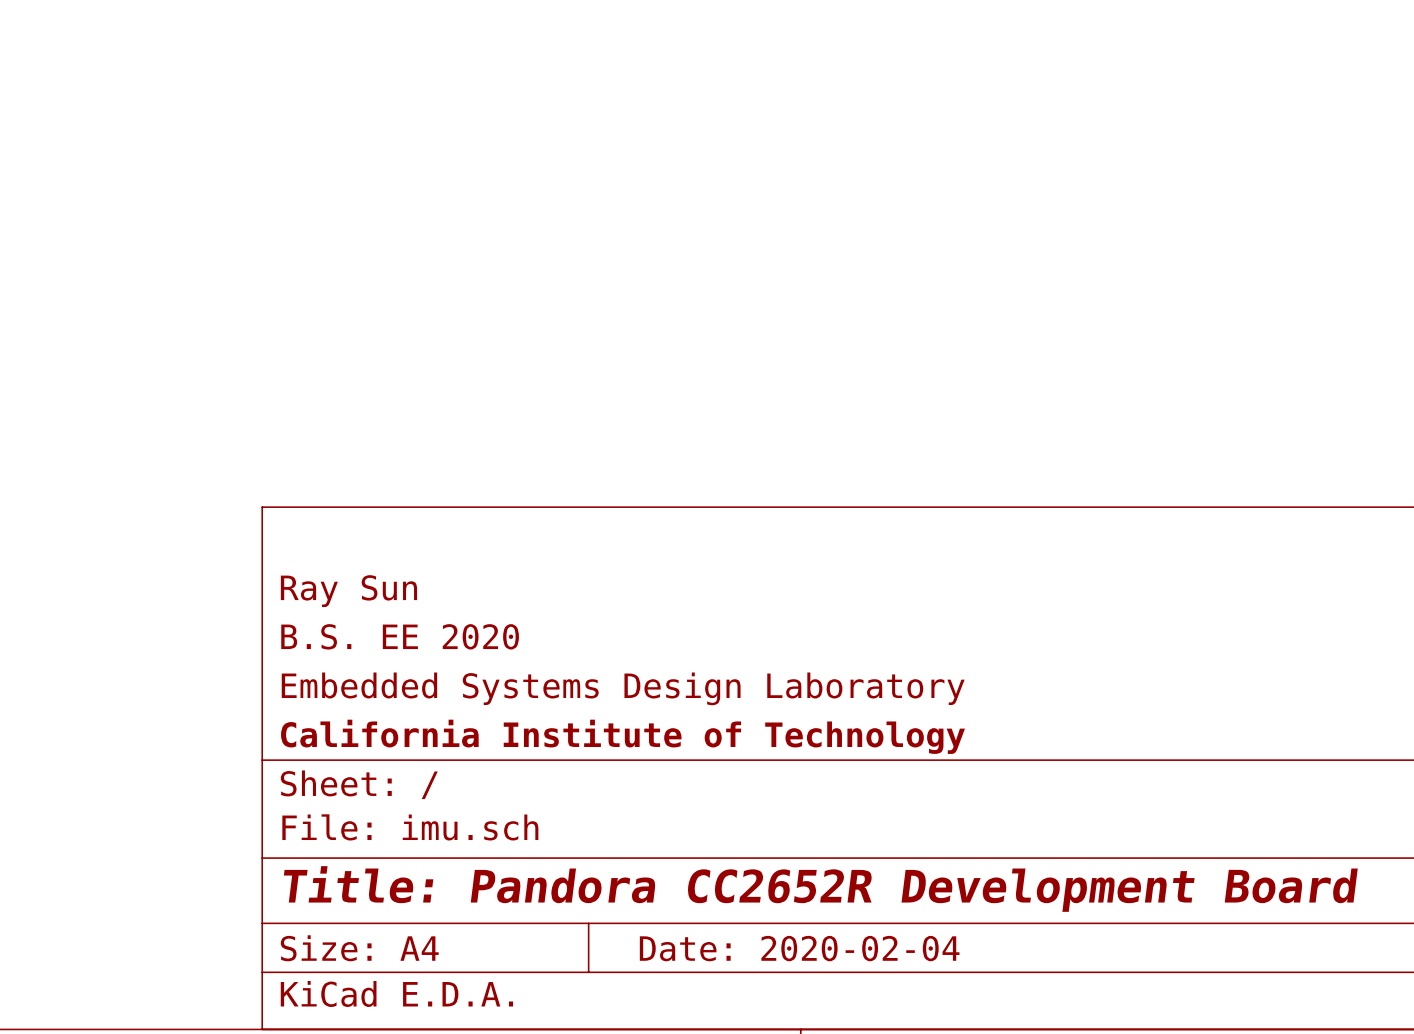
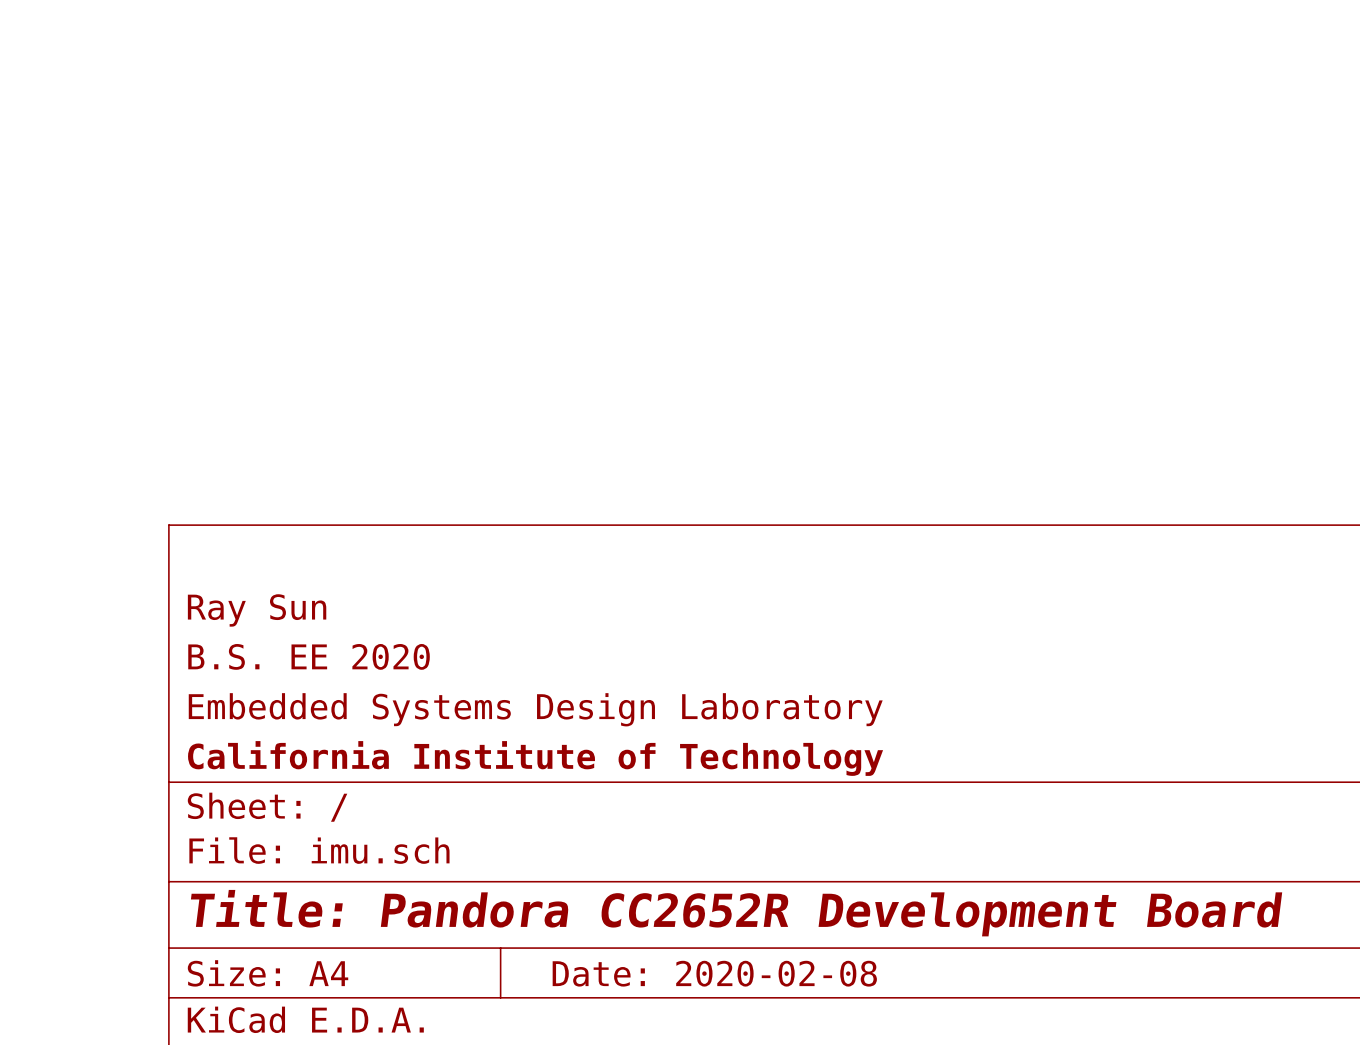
title block: Date: 2020-02-04 (799, 948) -> Date: 2020-02-08 (714, 973)

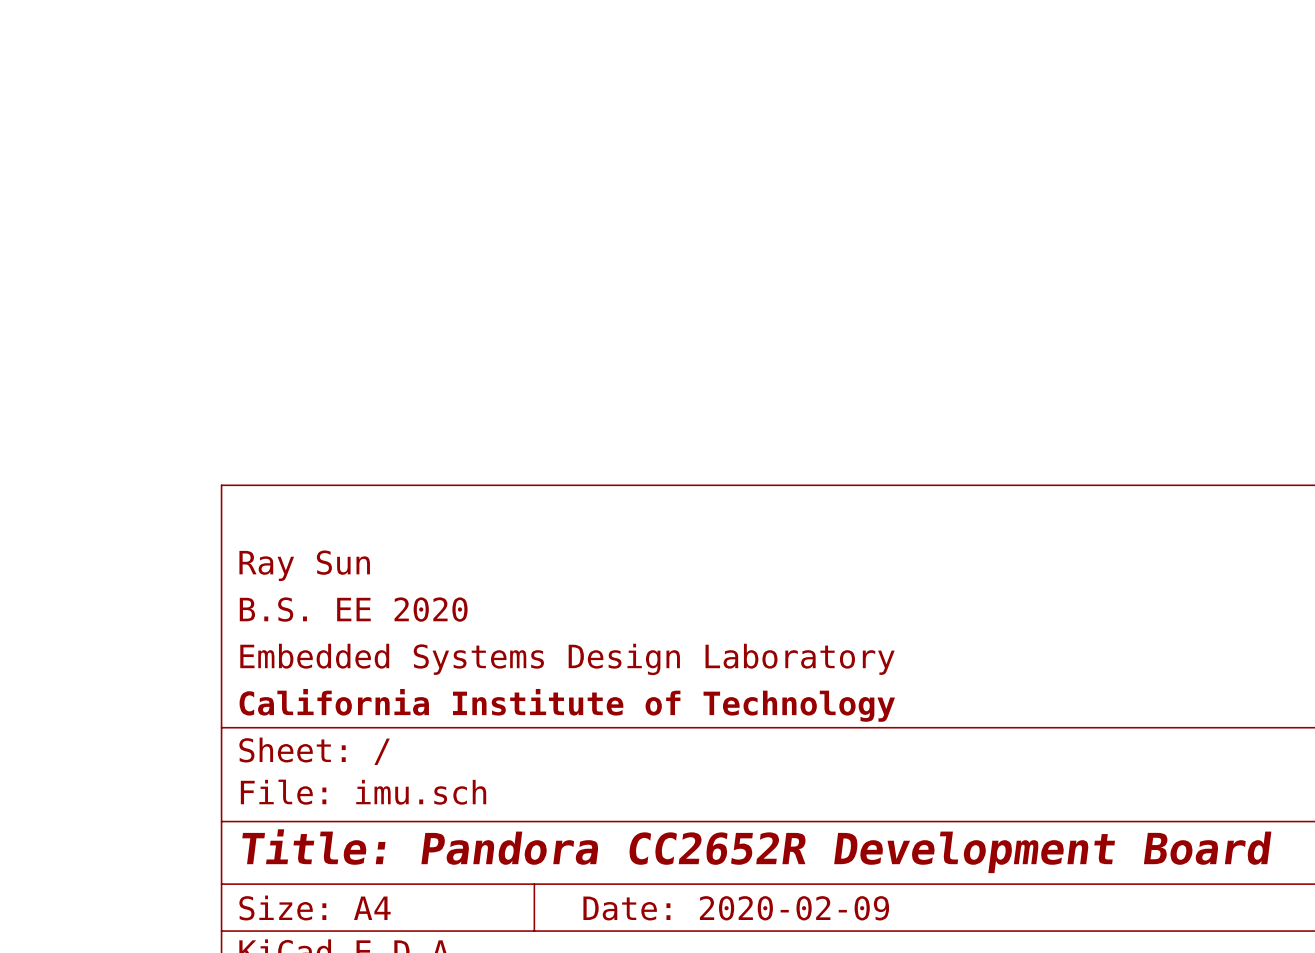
title block: Date: 2020-02-08 (714, 973) -> Date: 2020-02-09 (736, 908)

